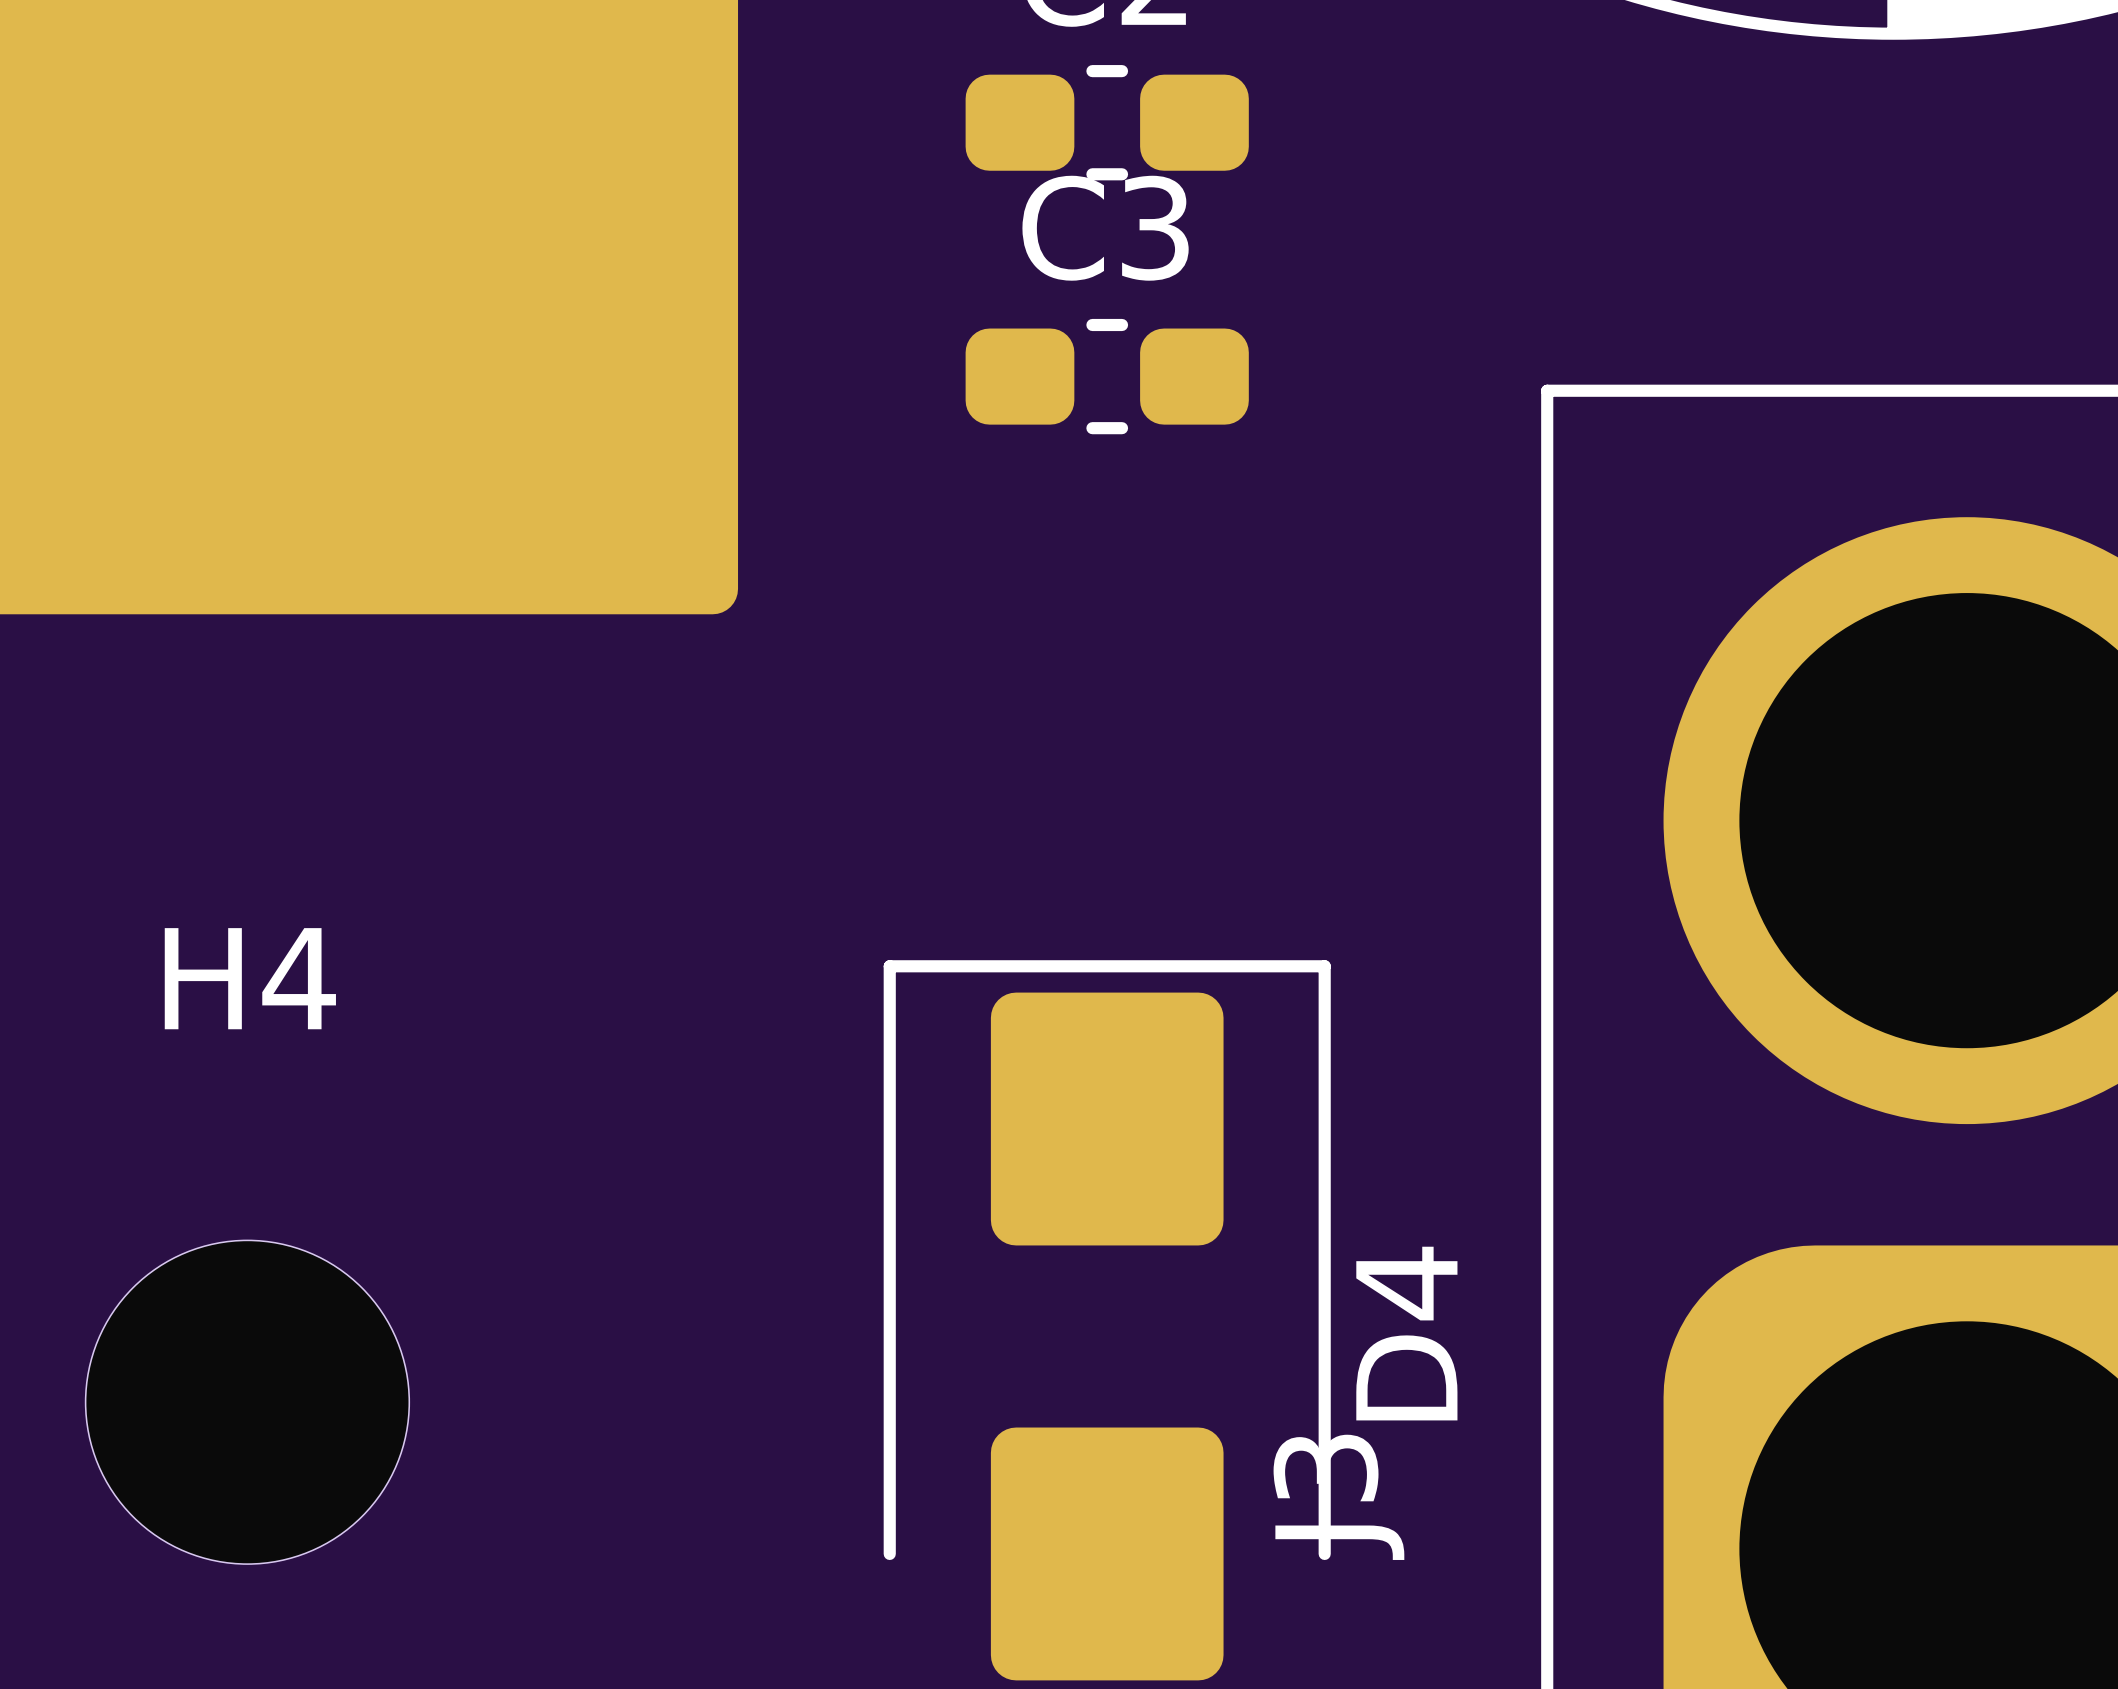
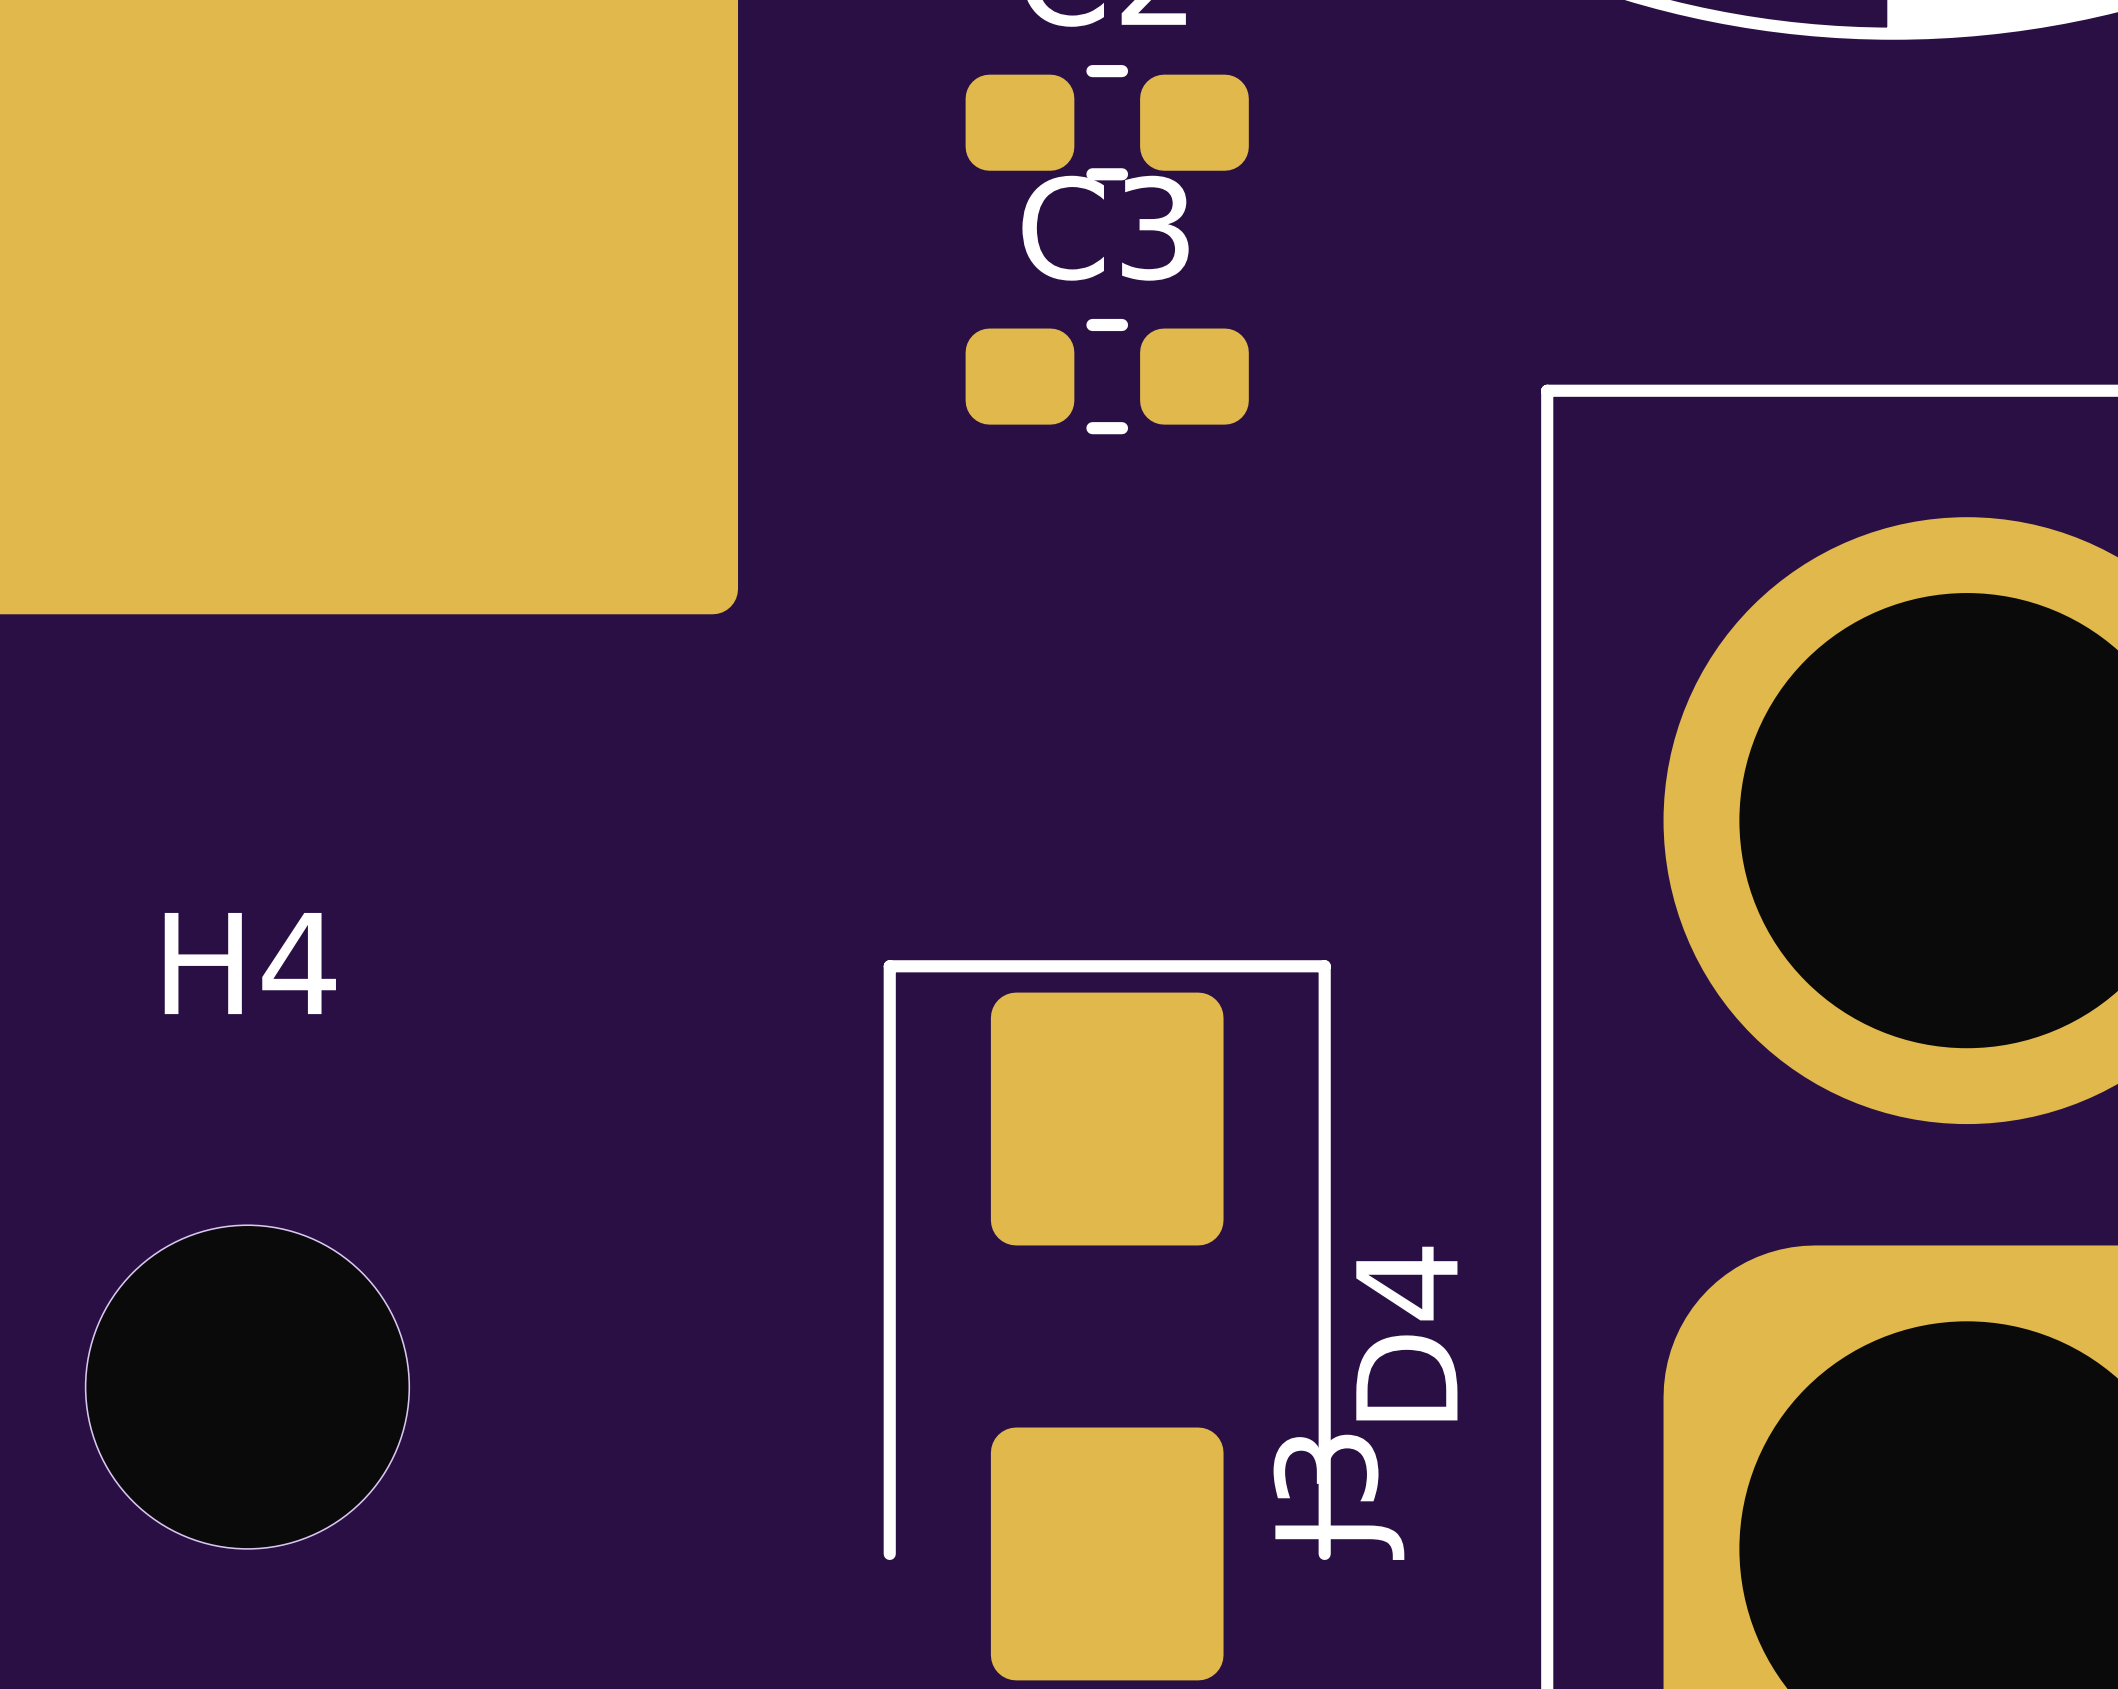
H4 position: (247, 1402) -> (247, 1387)

